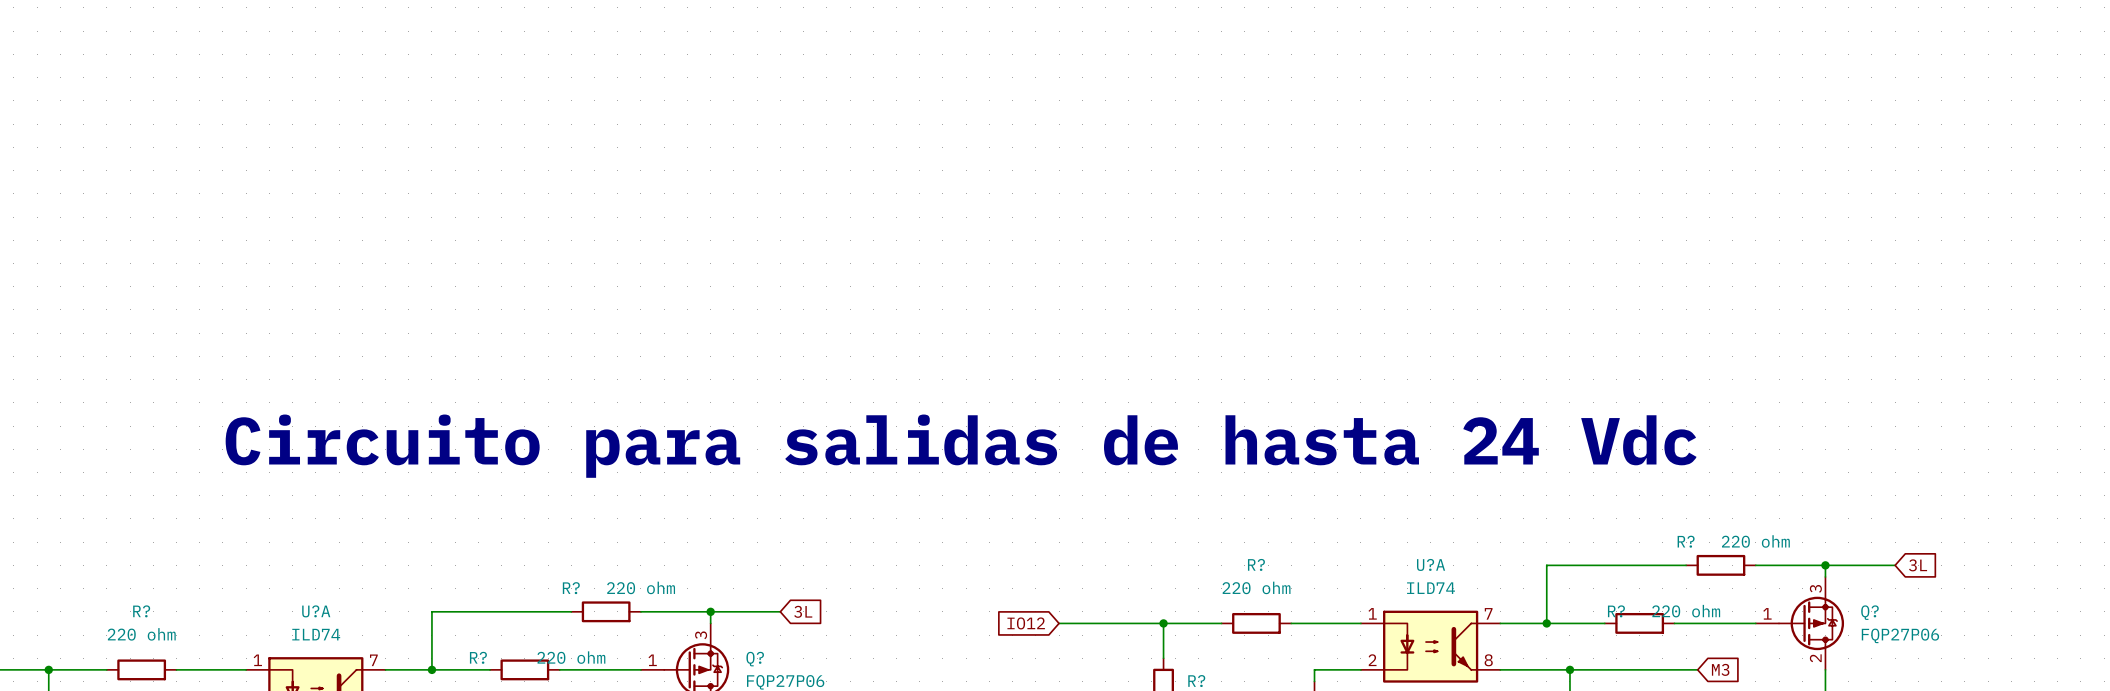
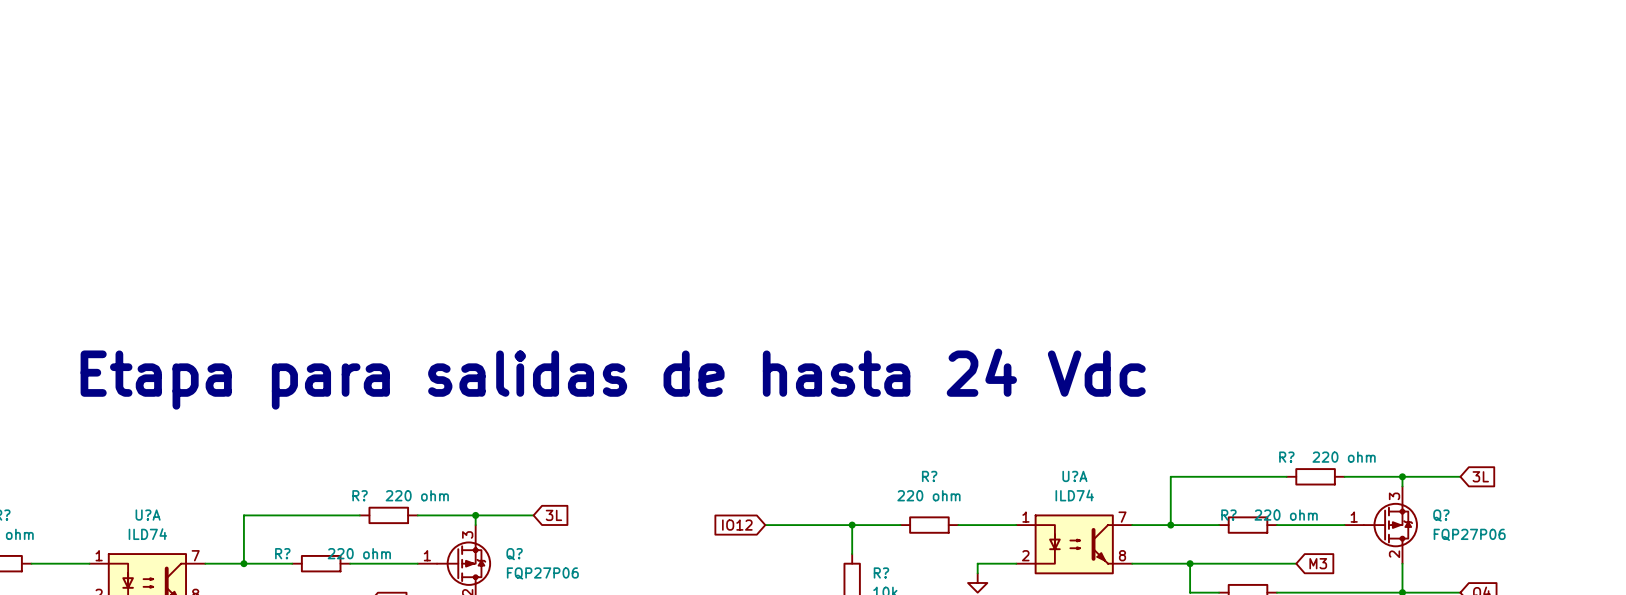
text: Circuito para salidas de hasta 24 Vdc (961, 446) -> Etapa para salidas de hasta 24 Vdc (613, 379)

